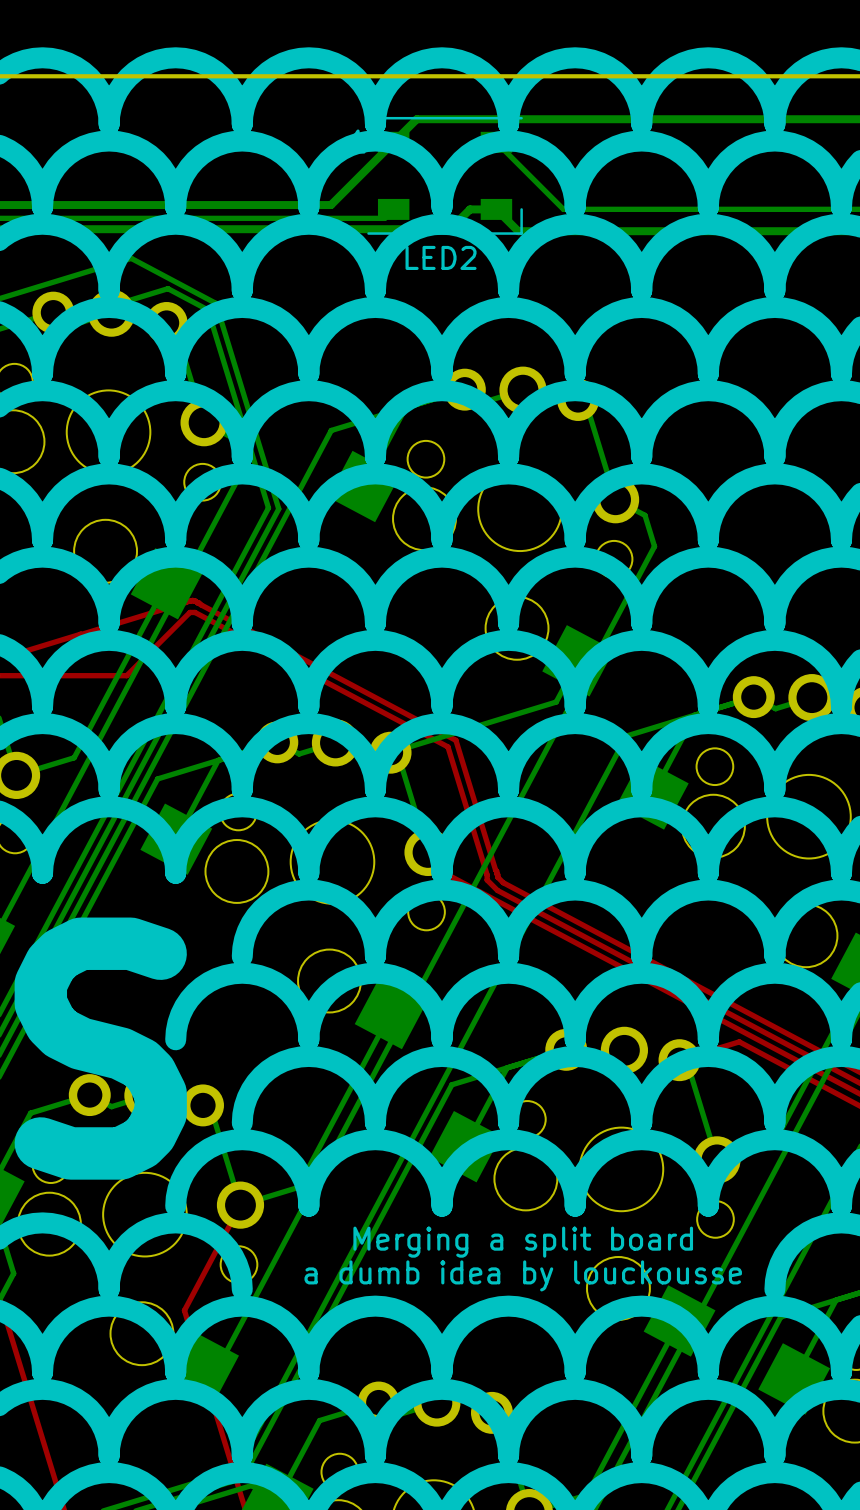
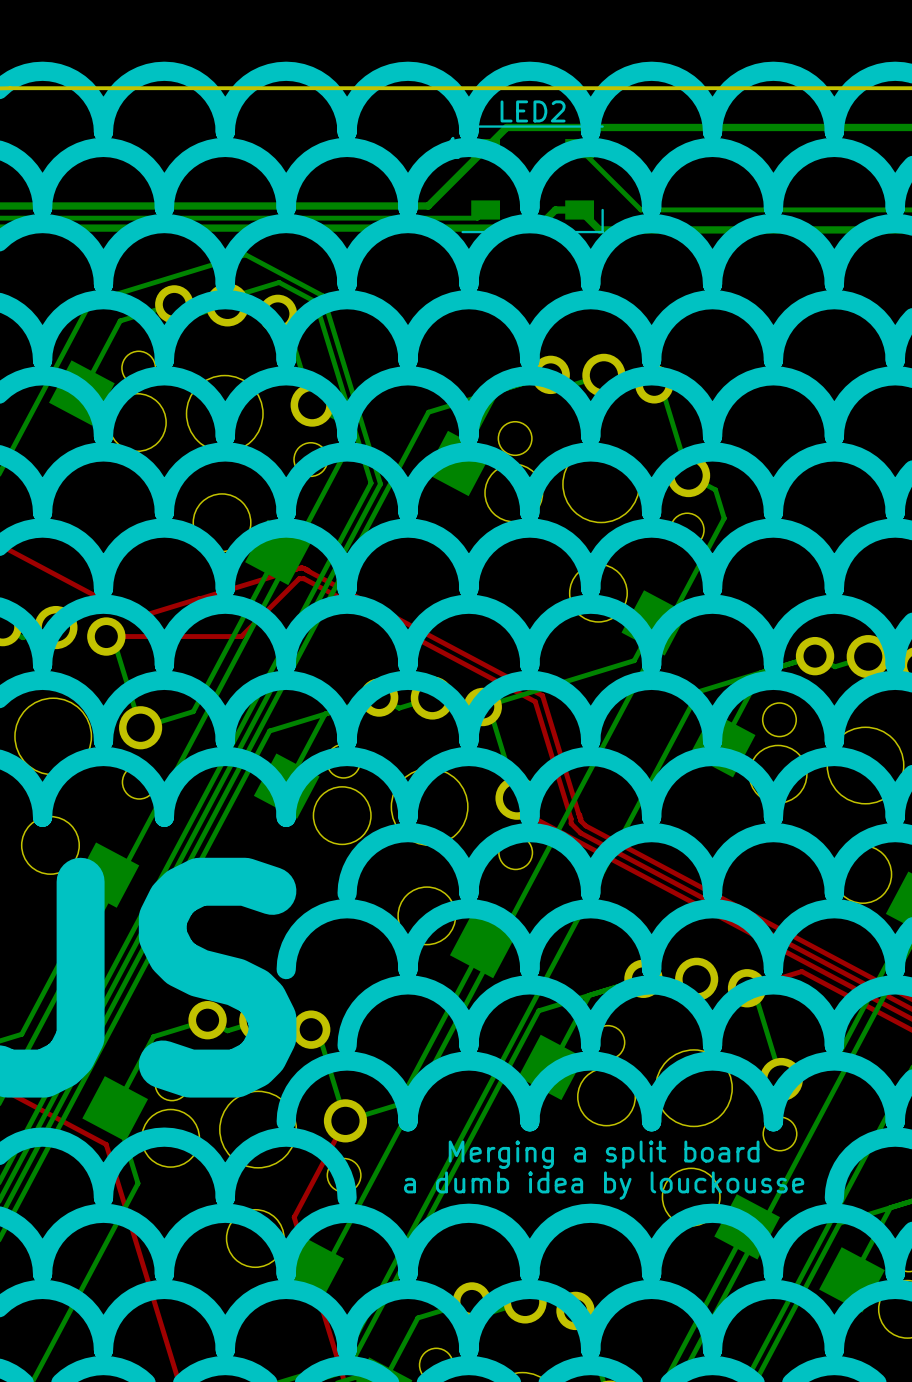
LED2 name position: LED2 (441, 257) -> LED2 (533, 111)

